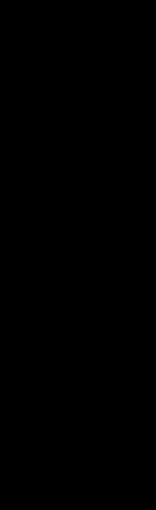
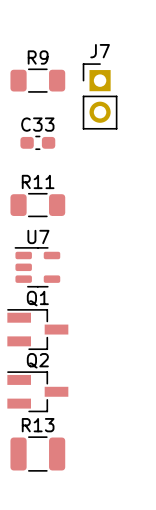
R9: none -> (37, 80)
J7: none -> (100, 96)
C33: none -> (37, 142)
R11: none -> (37, 205)
U7: none -> (37, 267)
Q1: none -> (37, 329)
Q2: none -> (37, 391)
R13: none -> (37, 454)

